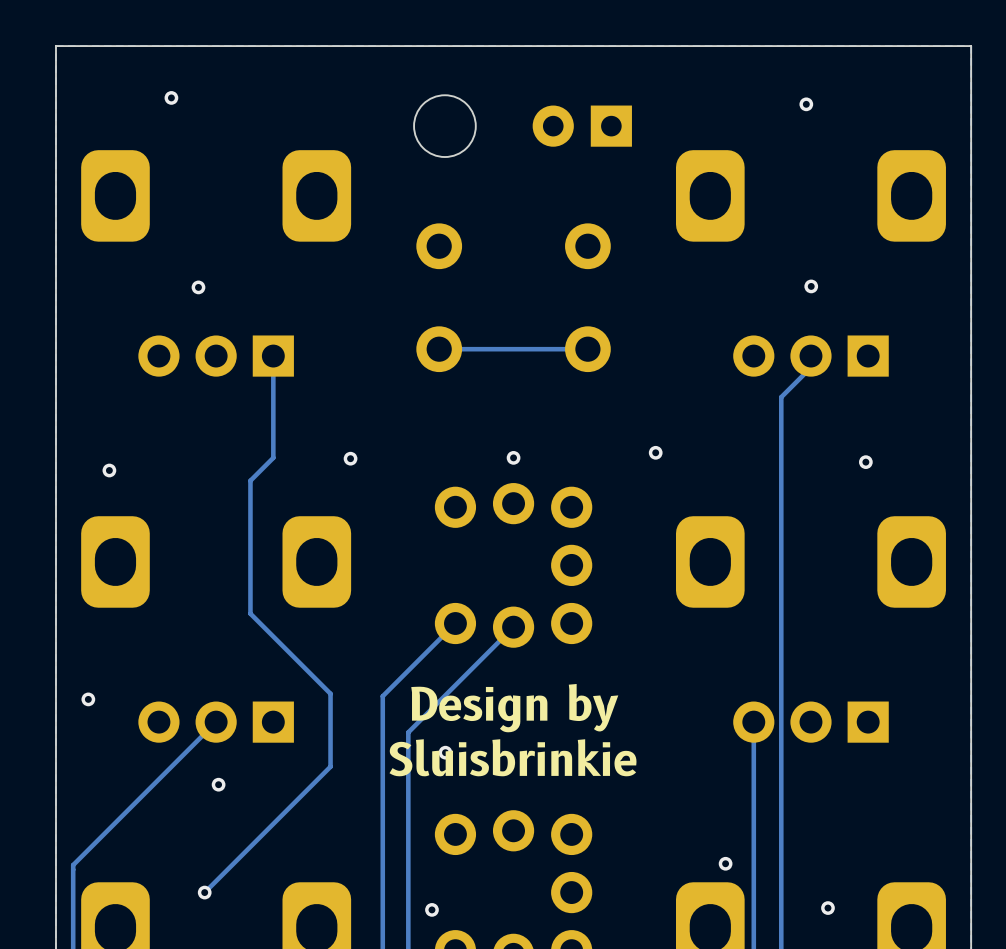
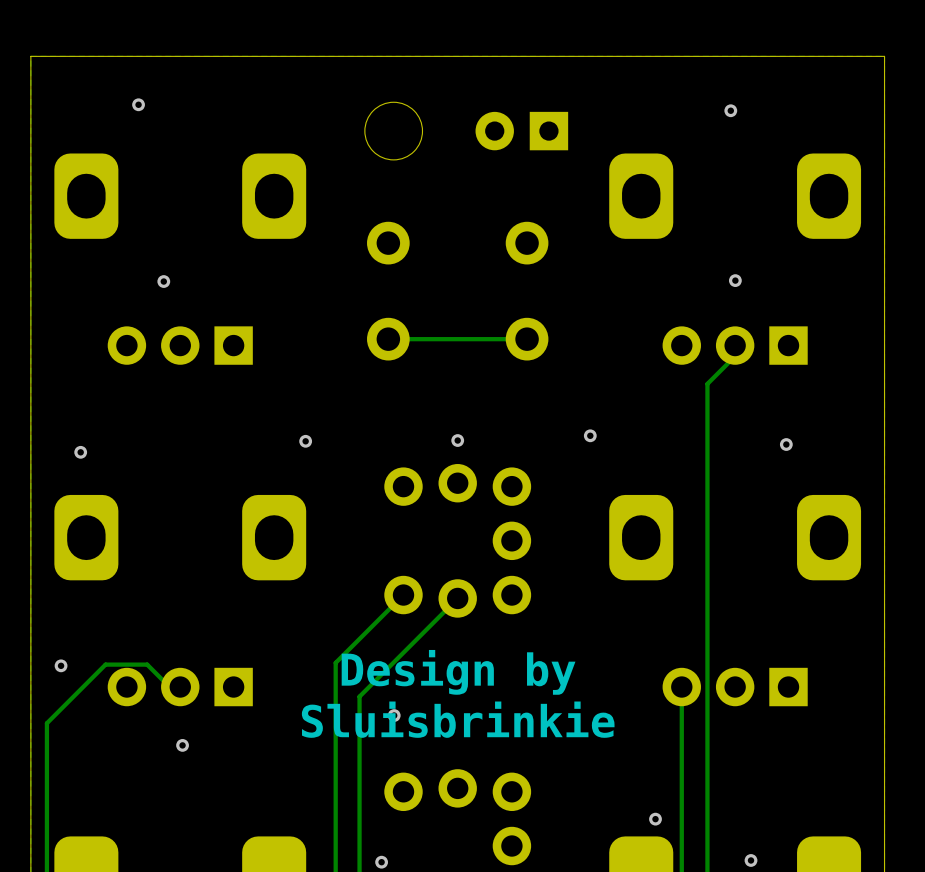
track: (273, 356) (273, 457) (250, 480) (250, 613) (330, 693) (330, 766) (204, 892) -> none
track: (198, 716) (210, 716) (216, 722) (73, 865) -> (164, 681) (147, 664) (105, 664) (46, 723) (46, 820)
via: (204, 892) -> none

